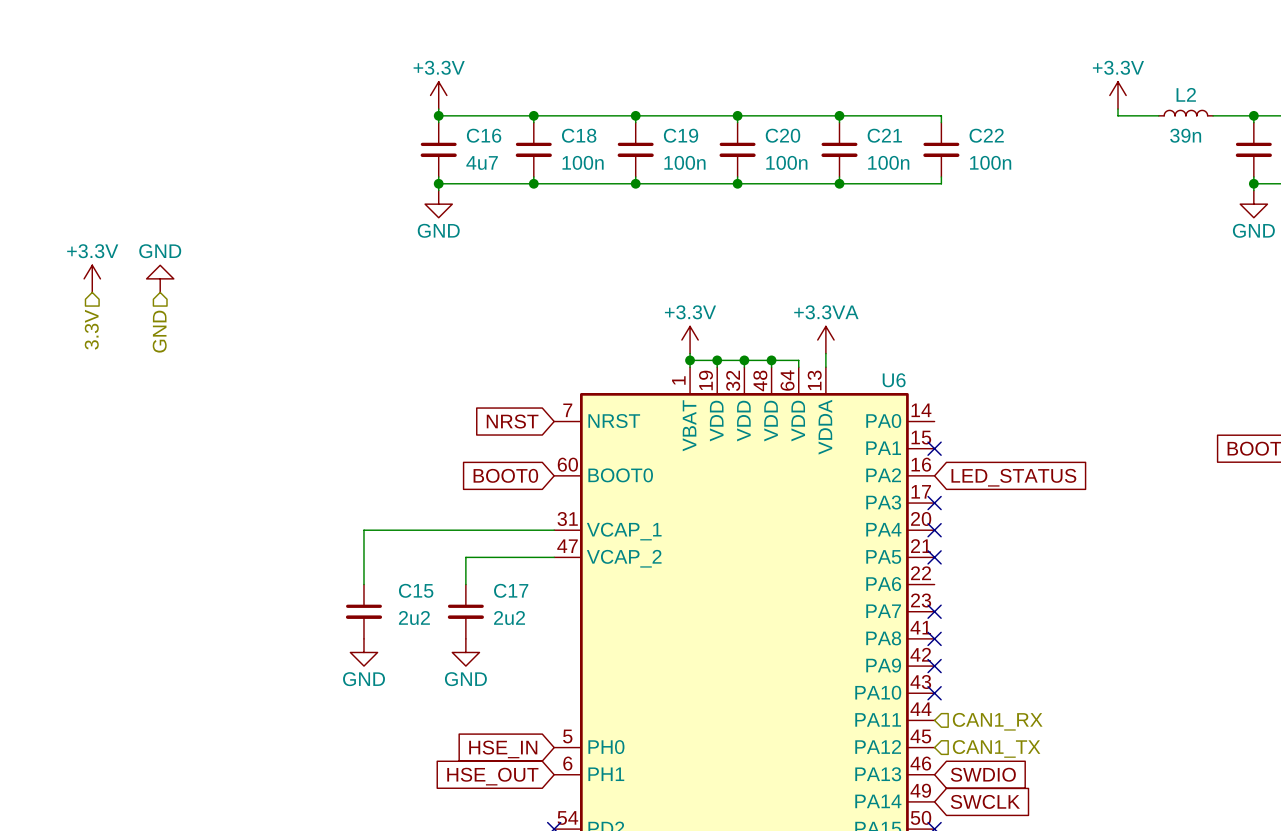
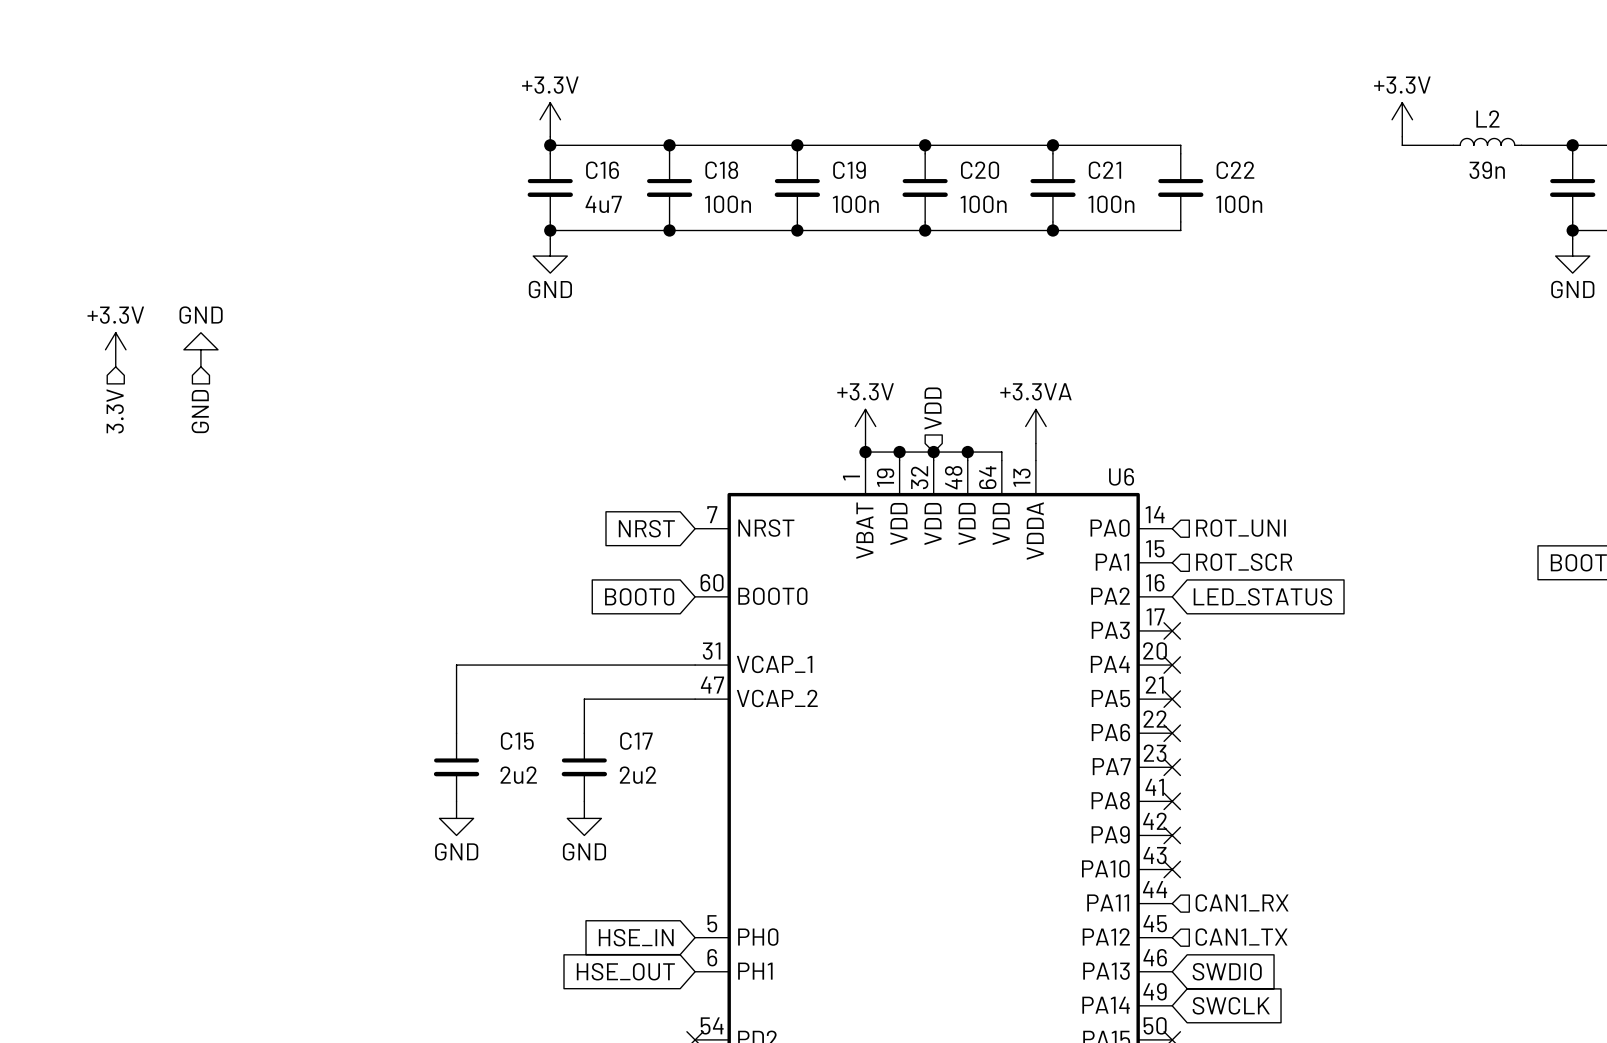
hierarchical label: none -> VDD (933, 408)
hierarchical label: none -> ROT_UNI (1240, 528)
no-connect mark: (934, 448) -> none
hierarchical label: none -> ROT_SCR (1244, 562)
no-connect mark: none -> (1172, 733)

